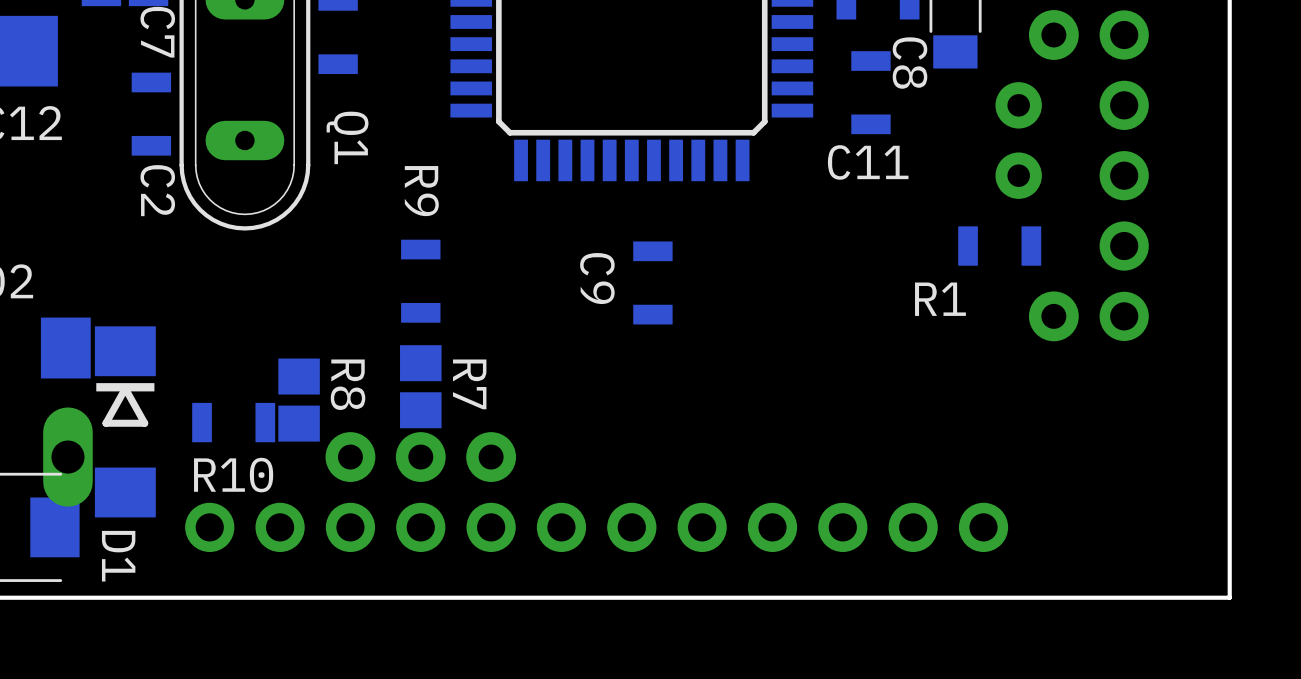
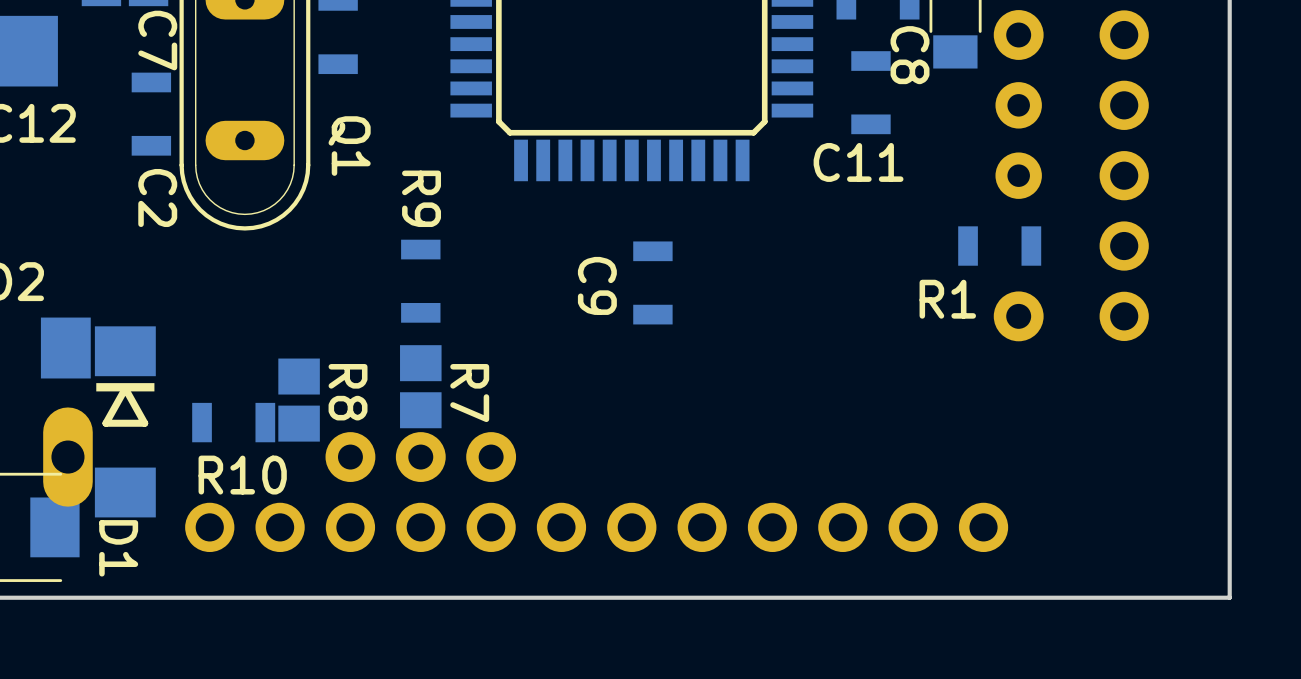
part position: (1053, 34) -> (1018, 34)
part position: (1053, 316) -> (1018, 316)

